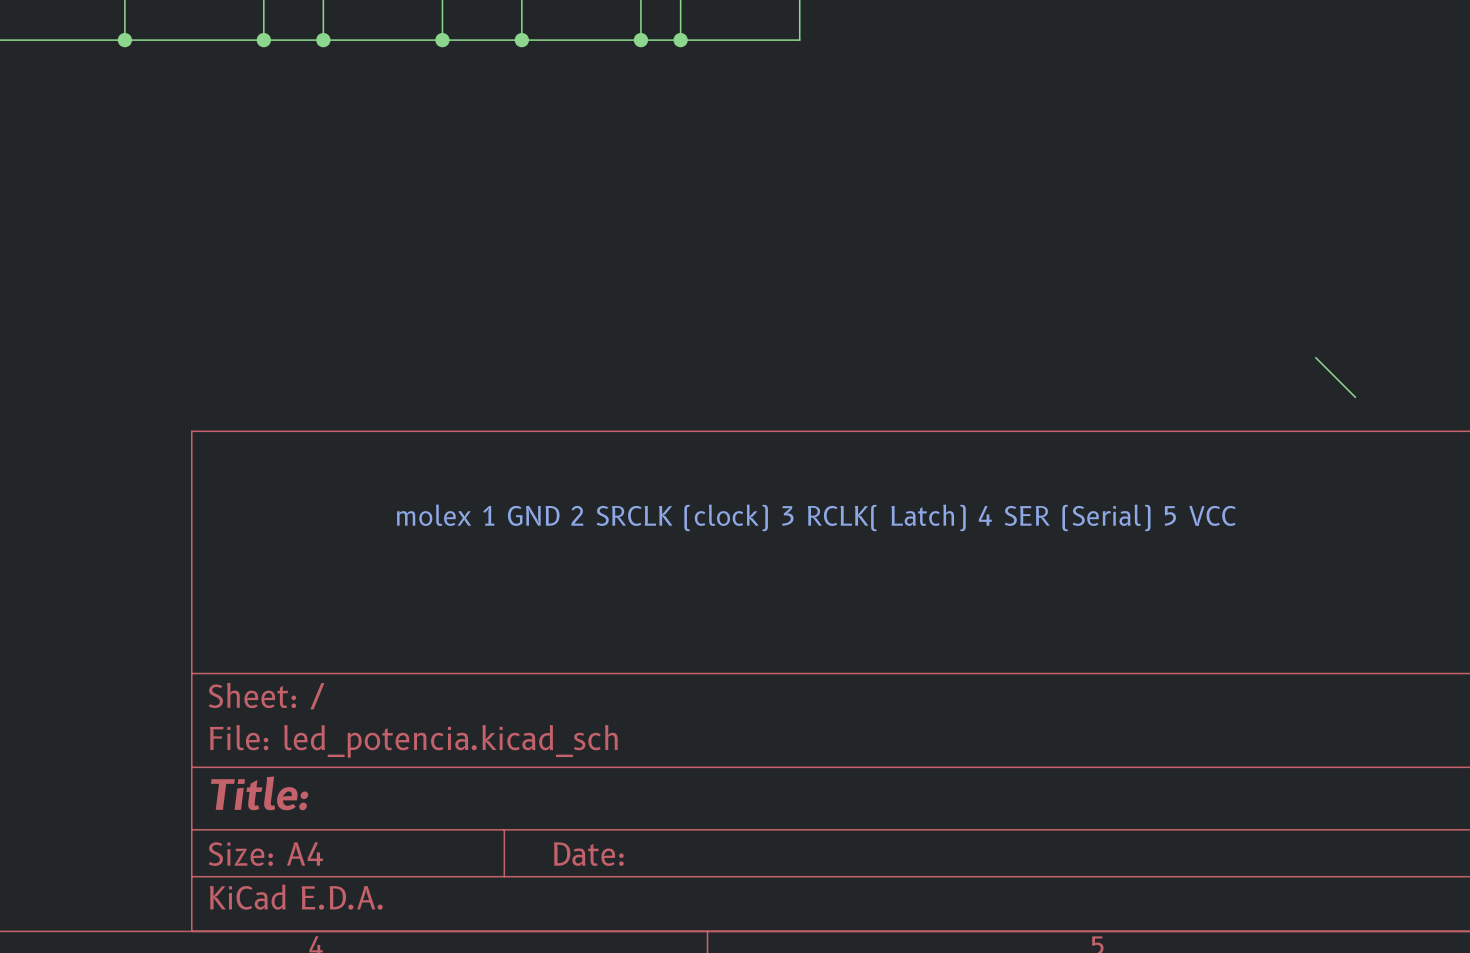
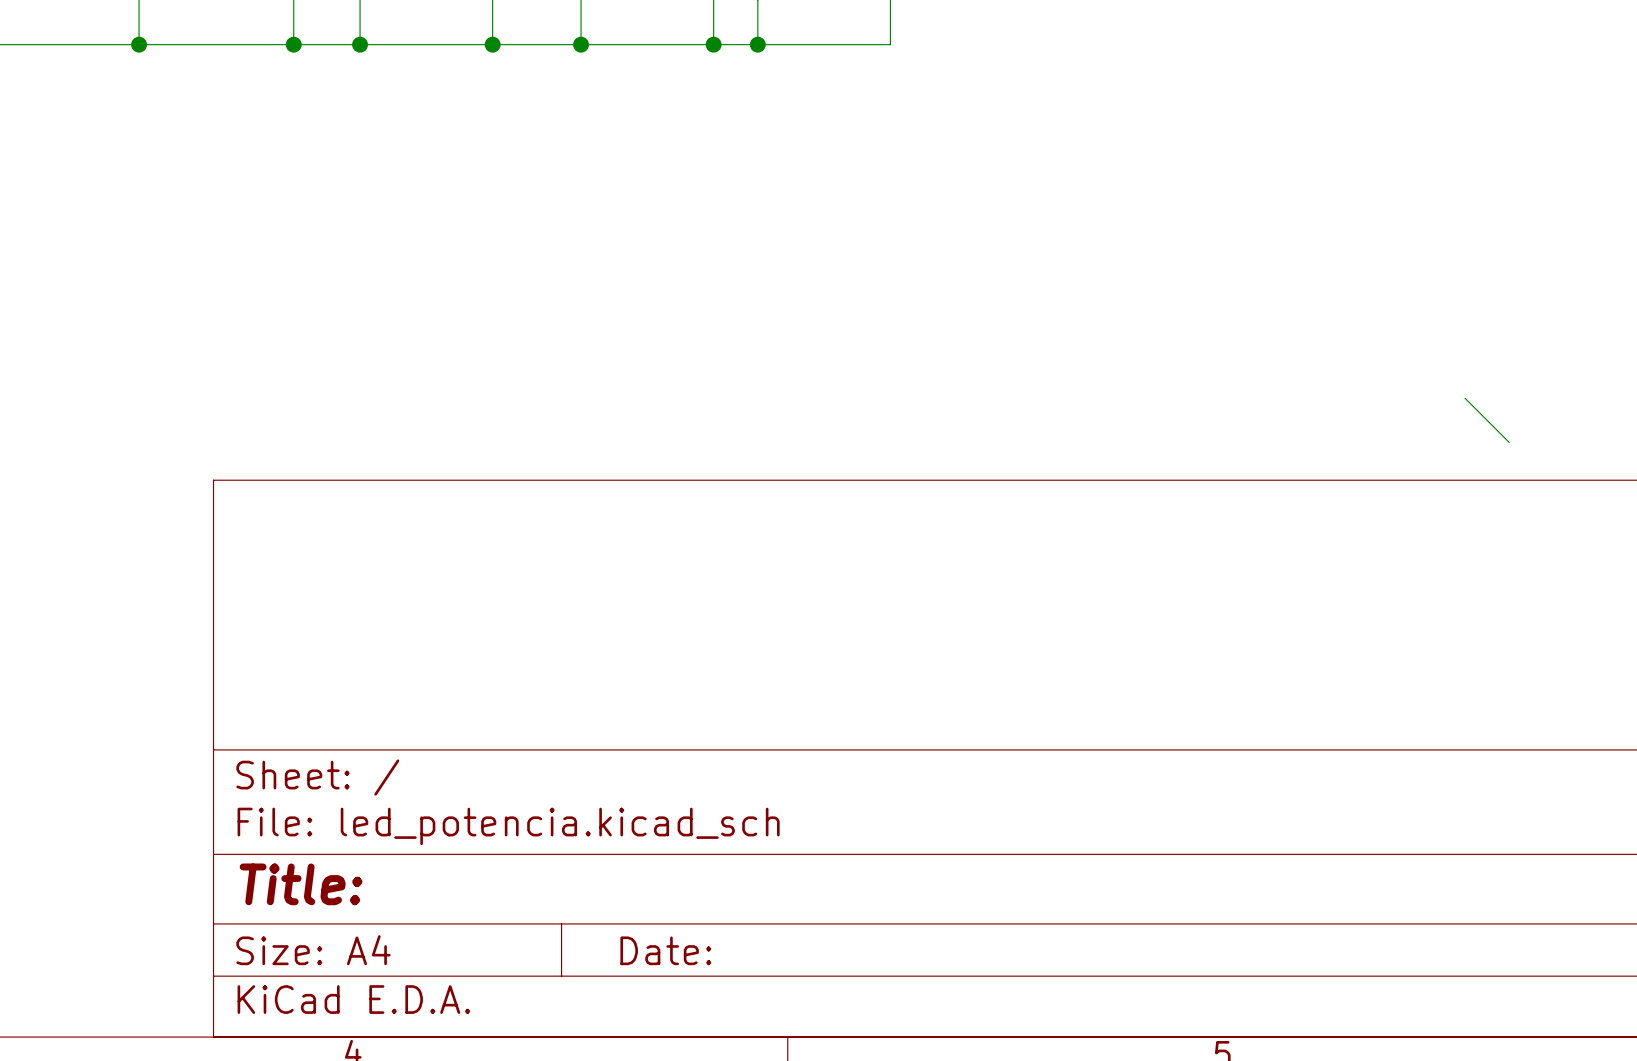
text: molex 1 GND 2 SRCLK (clock) 3 RCLK( Latch) 4 SER (Serial) 5 VCC (816, 517) -> none

